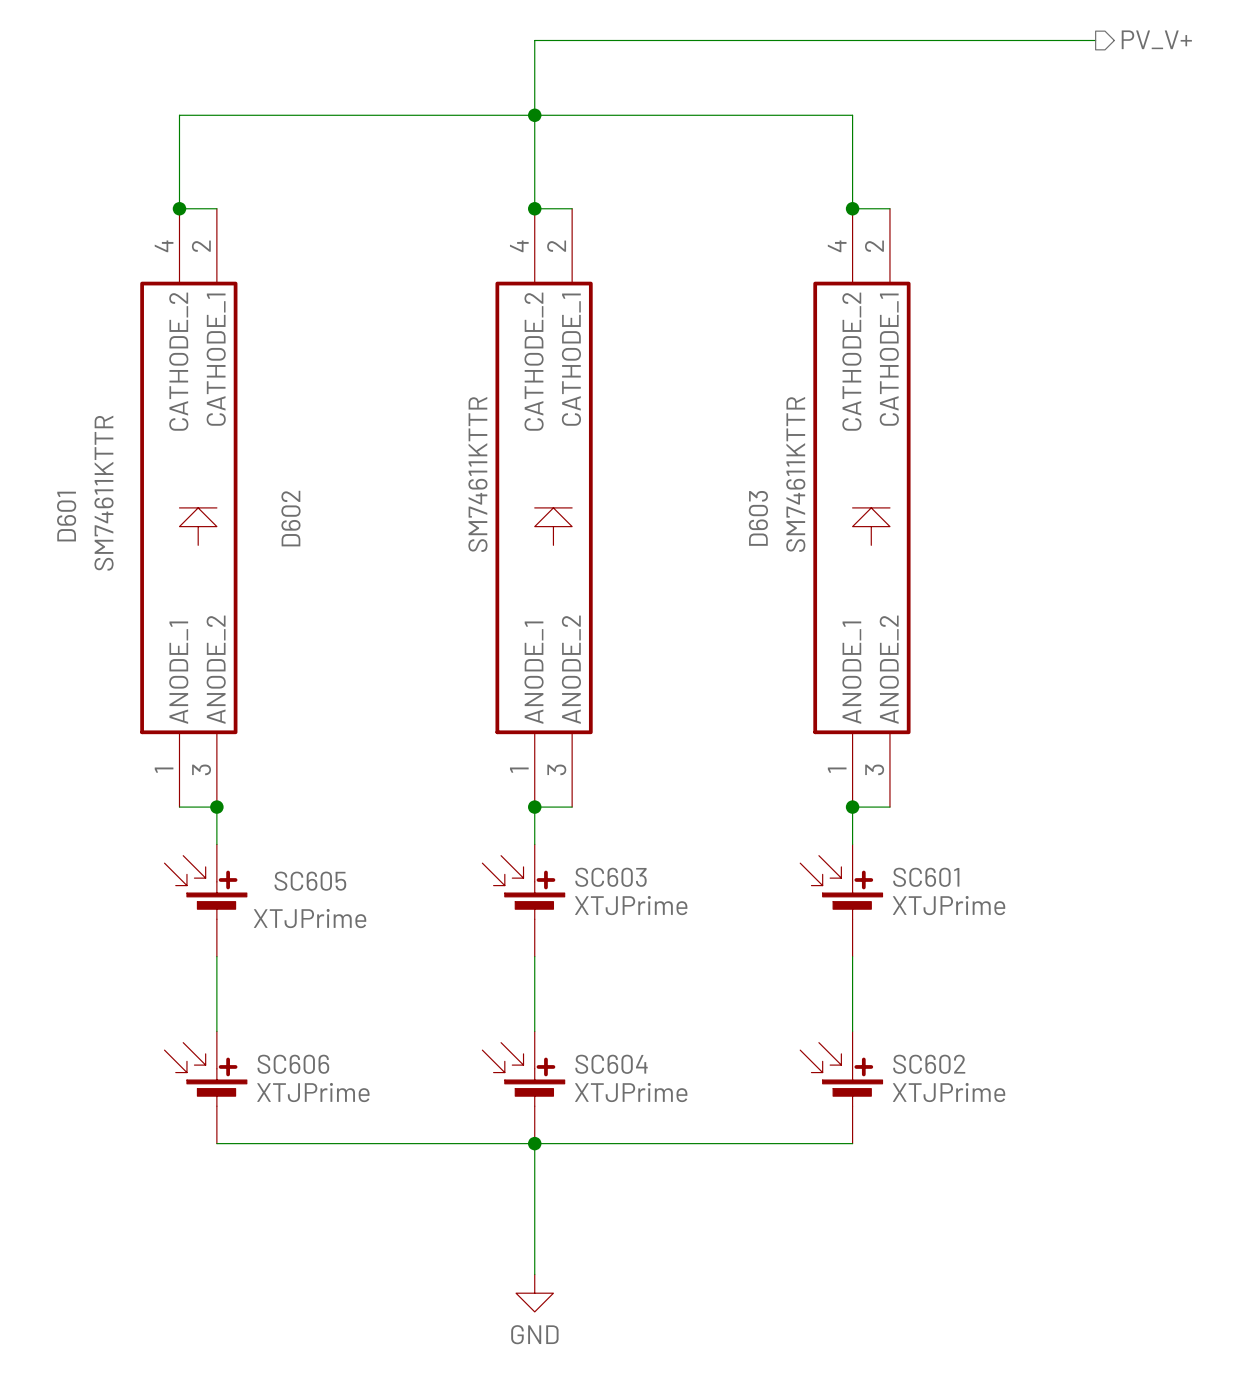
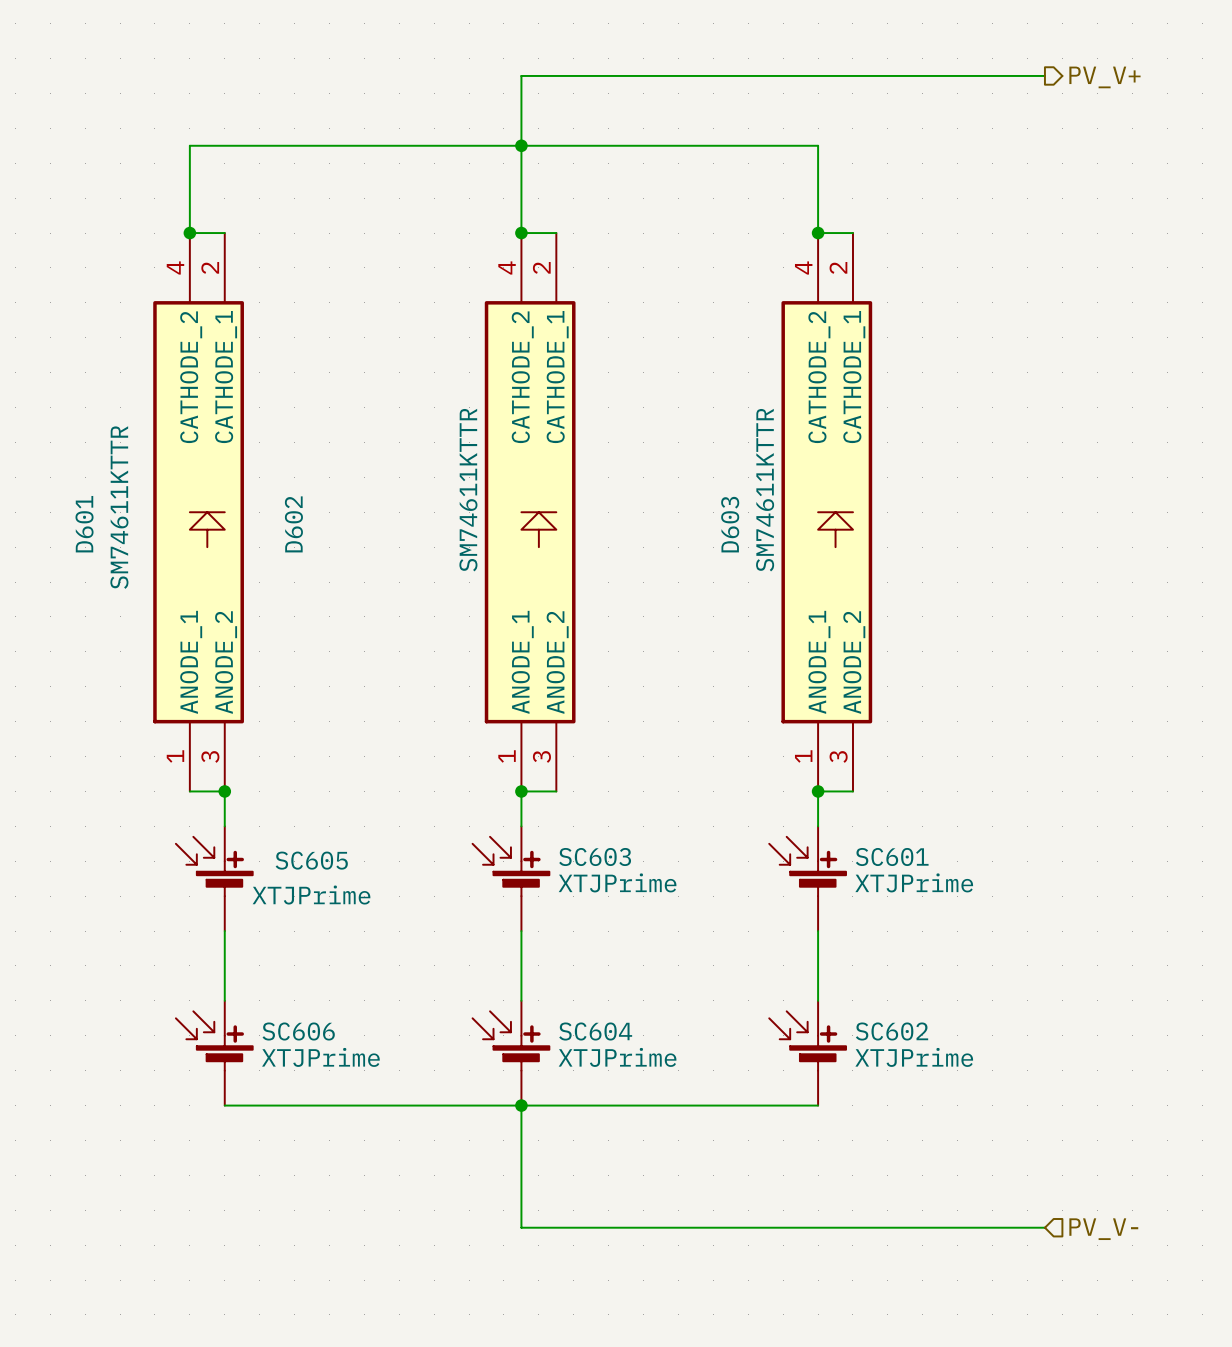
hierarchical label: none -> PV_V- (1103, 1229)
wire: none -> (521, 1227) (1044, 1227)
power symbol: GND (534, 1293) -> none

